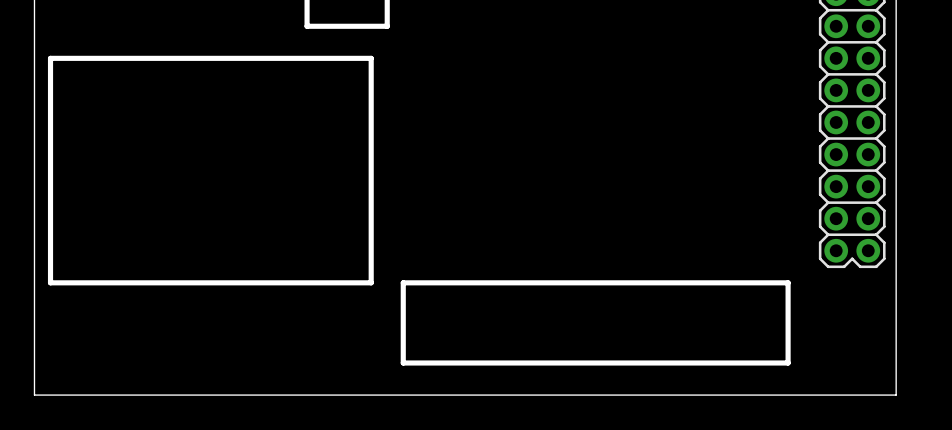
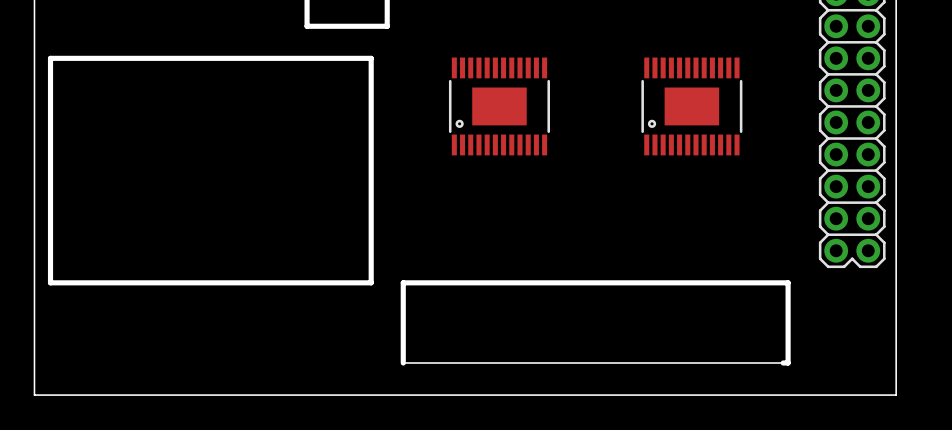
part: none -> (499, 106)
part: none -> (691, 106)
board edge width: thick (403, 363) (783, 363) -> thin (403, 363) (783, 363)

